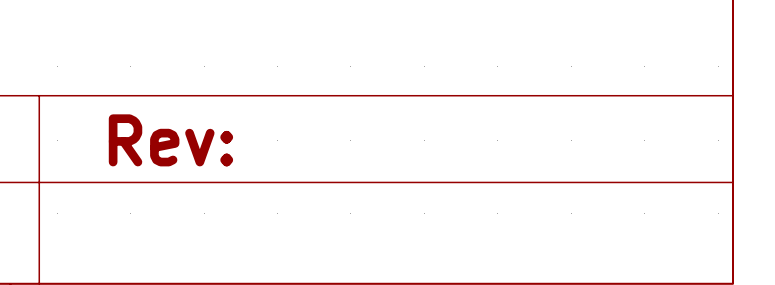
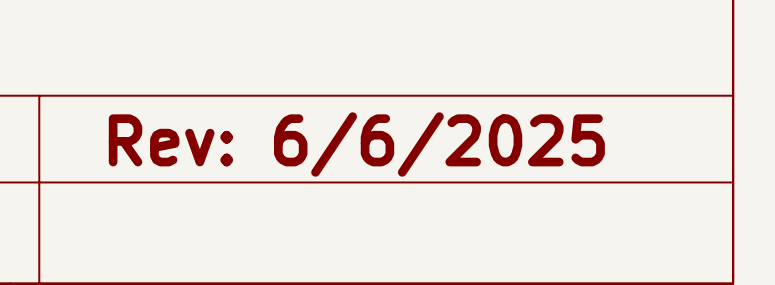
title block: Rev: (170, 140) -> Rev: 6/6/2025 (356, 144)

